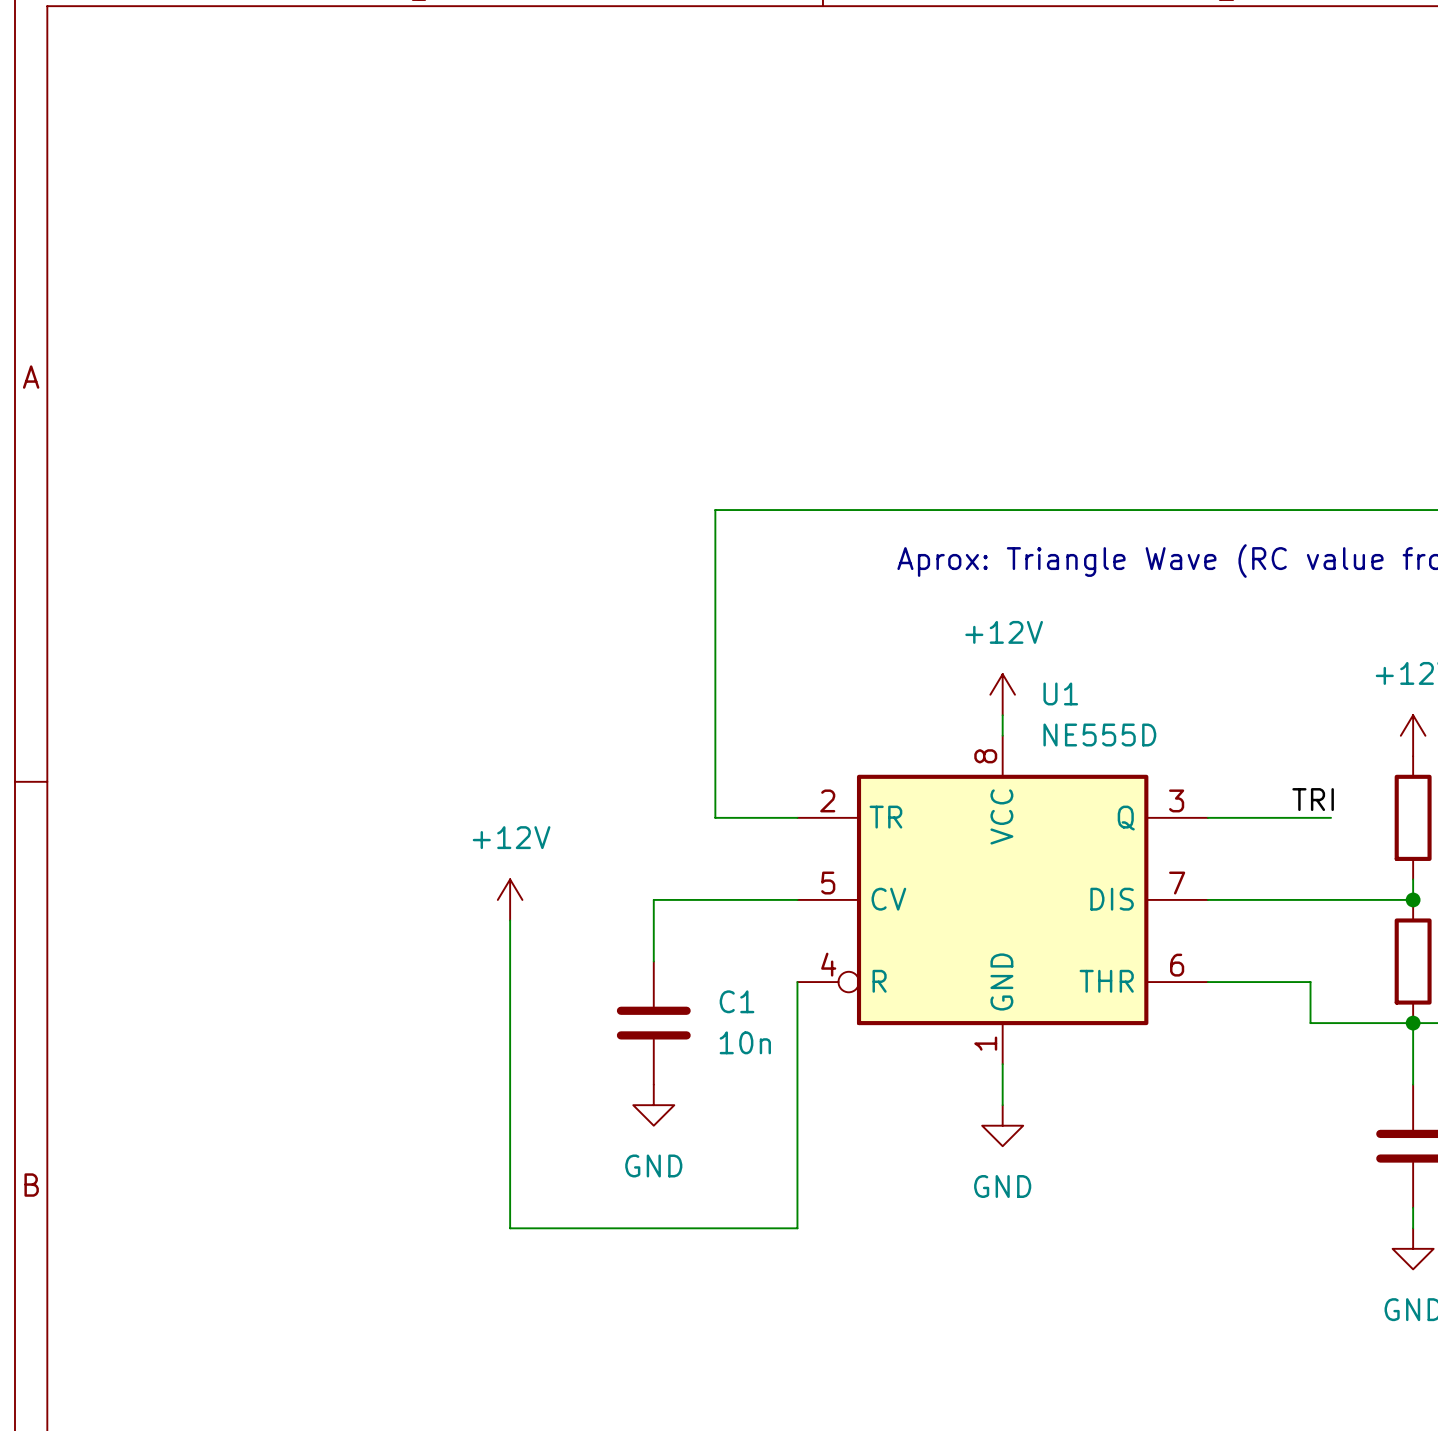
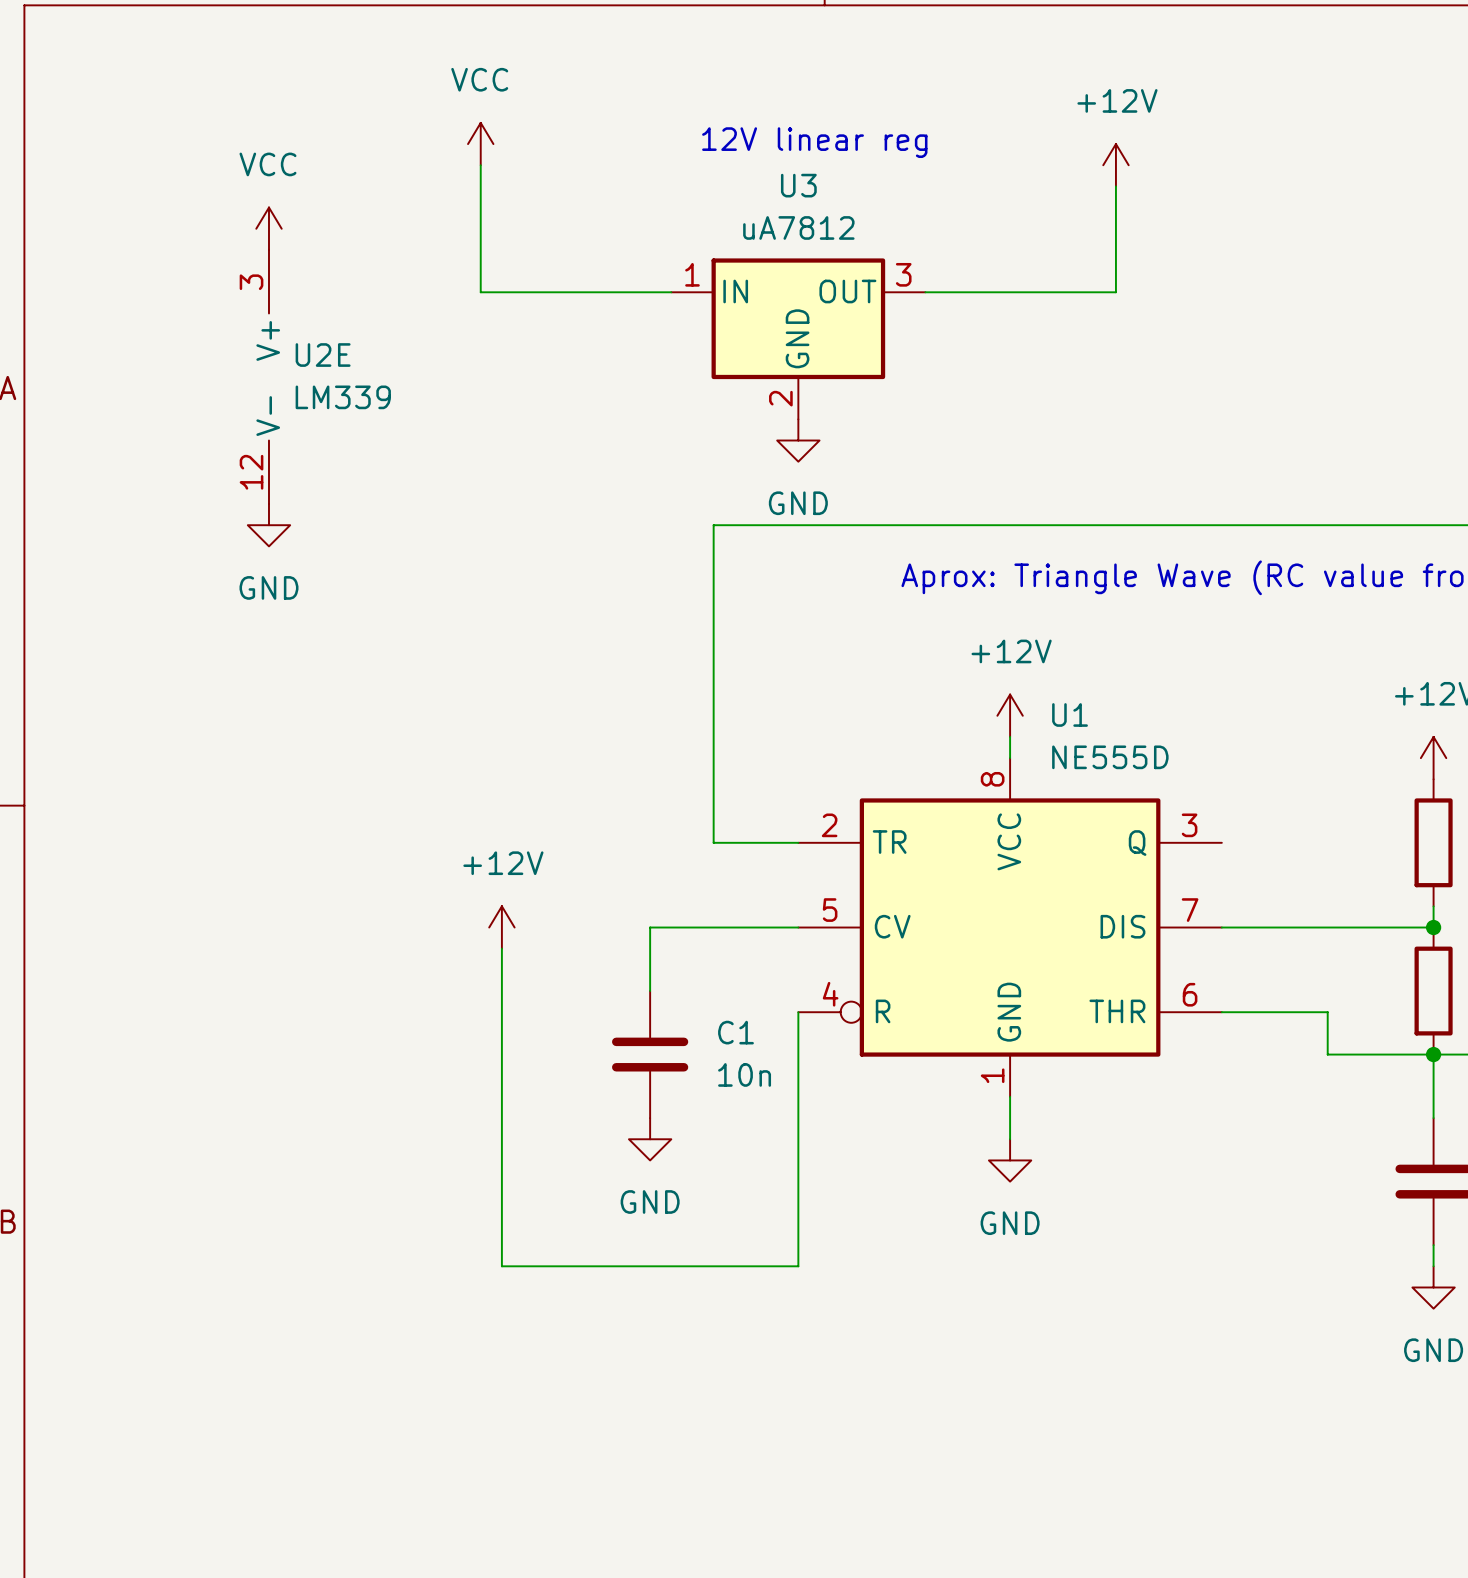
text: none -> 12V linear reg (814, 142)
power symbol: none -> VCC (480, 144)
wire: none -> (480, 165) (480, 292) (671, 292)
power symbol: none -> +12V (1115, 165)
wire: none -> (1115, 186) (1115, 292) (925, 292)
power symbol: none -> VCC (268, 228)
U3: none -> uA7812 (798, 338)
U2E: none -> LM339 (268, 376)
power symbol: none -> GND (798, 440)
power symbol: none -> GND (268, 525)
label: TRI (1313, 799) -> none
wire: (1207, 817) (1331, 817) -> none

